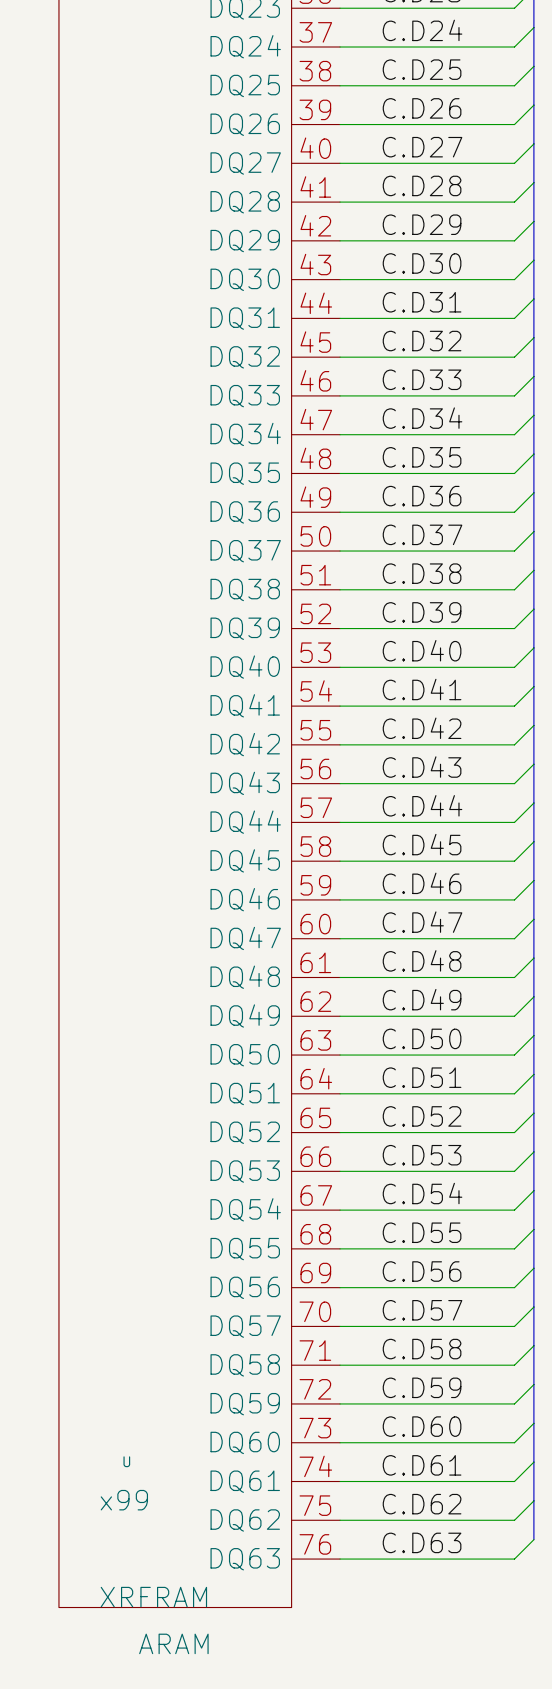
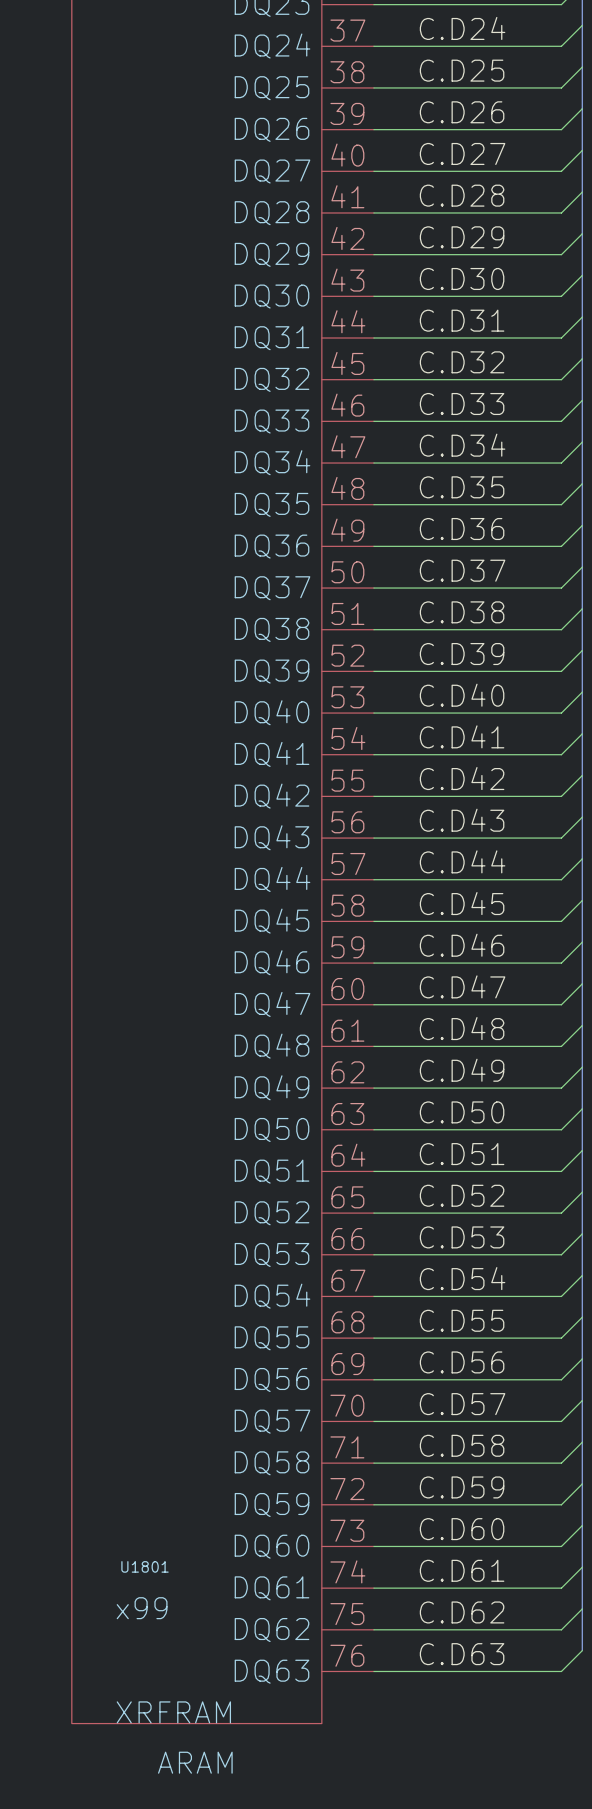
U name: U (126, 1461) -> U1801 (144, 1566)

